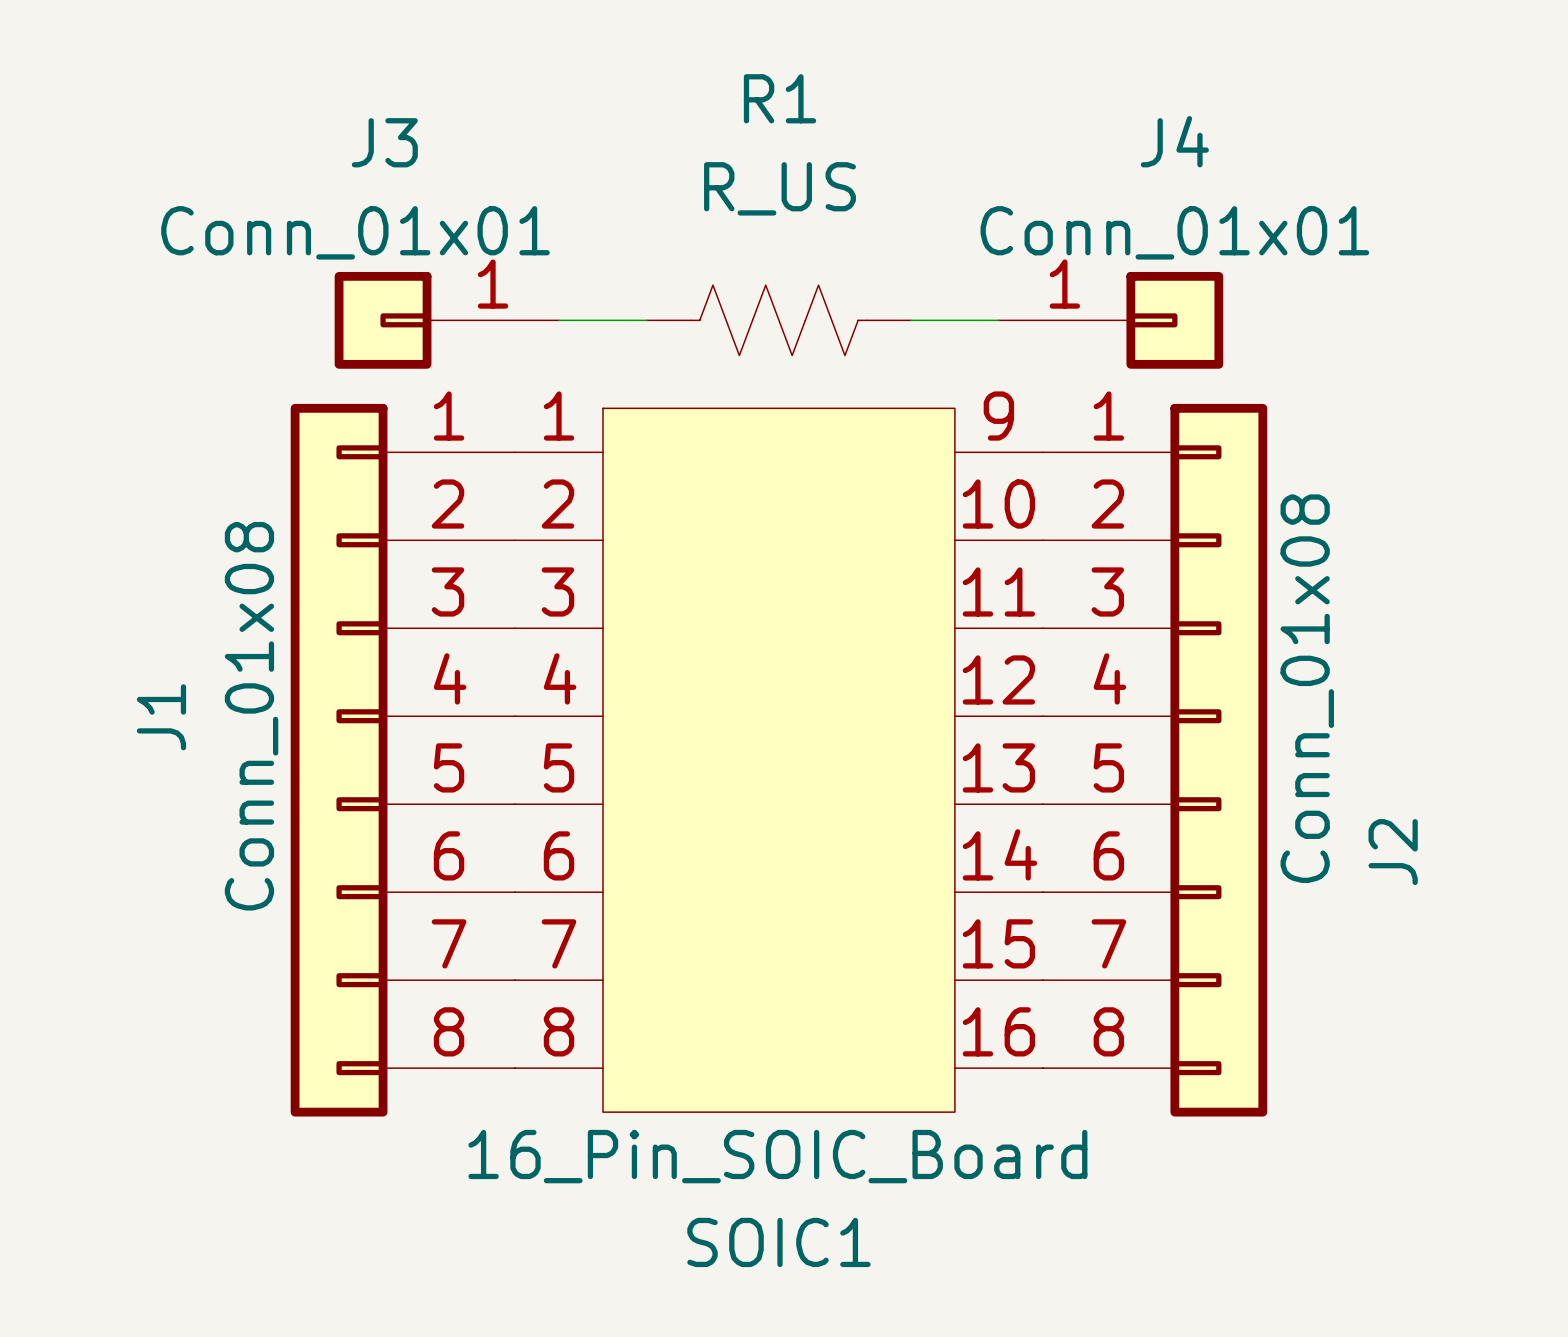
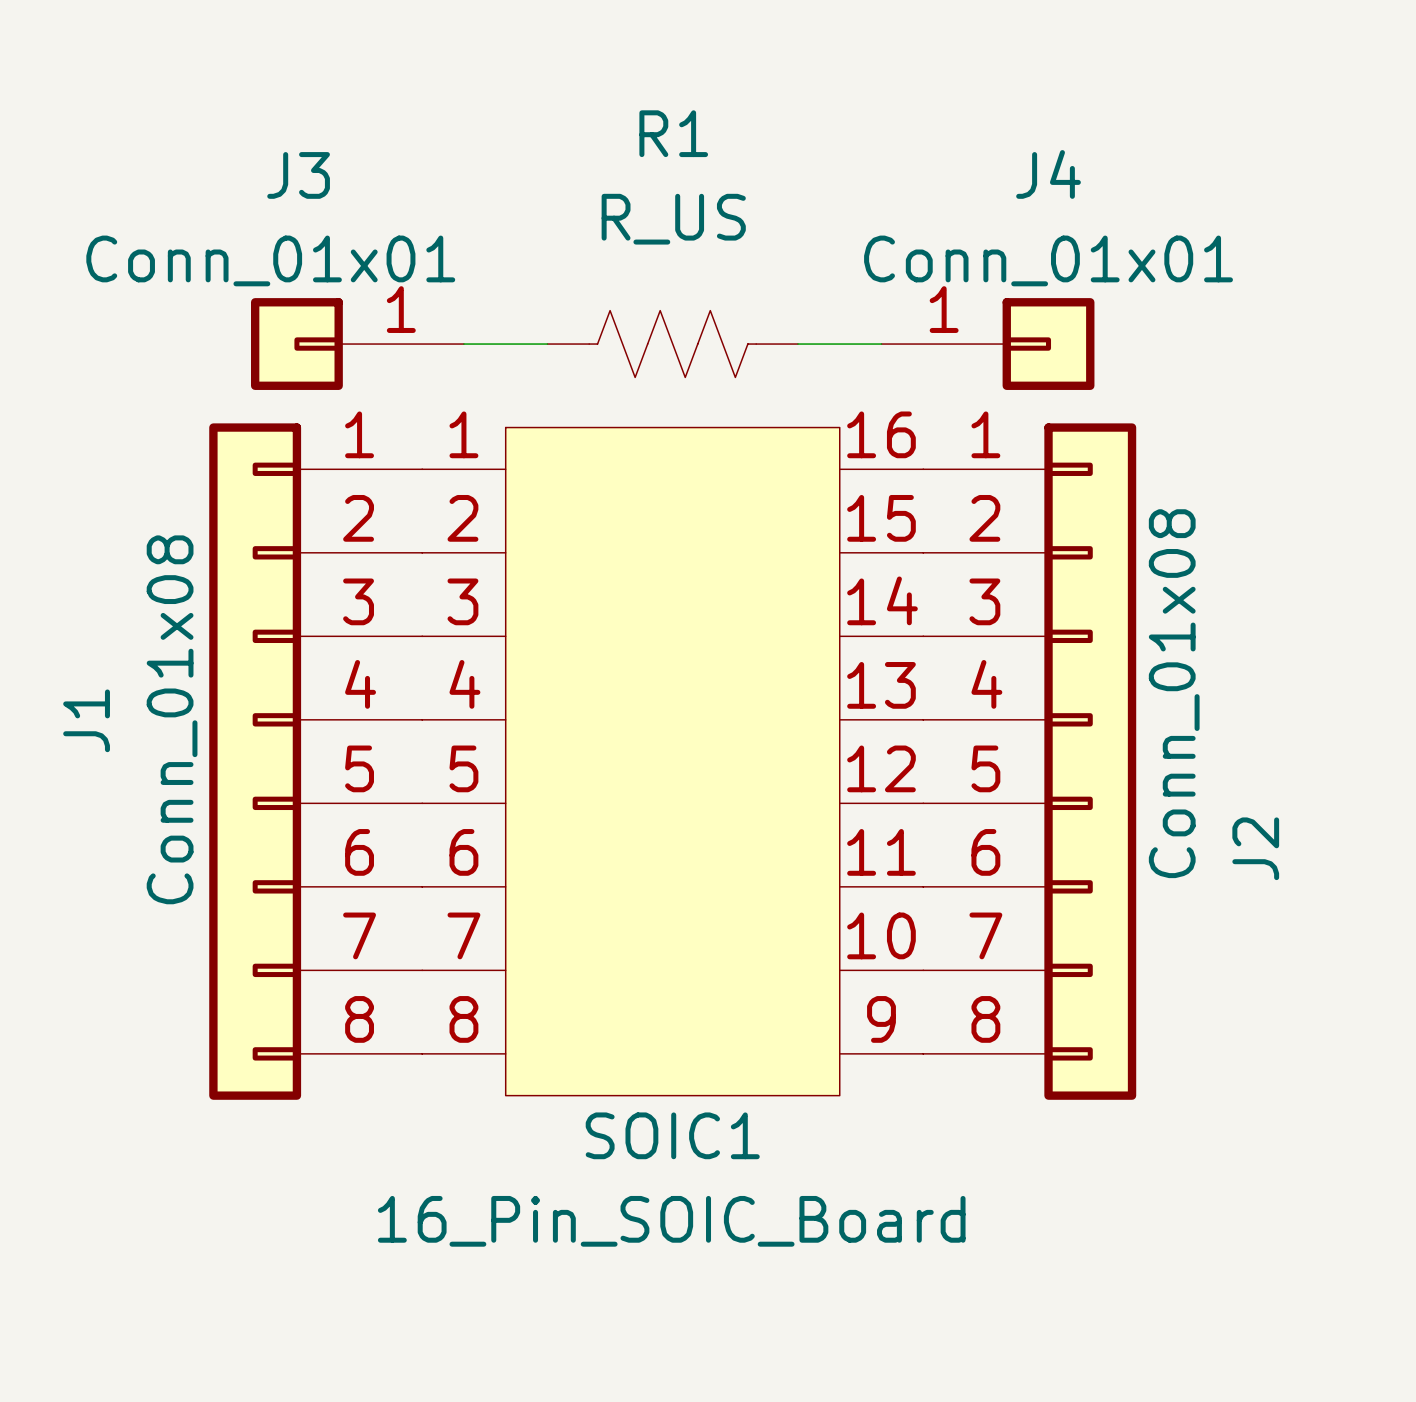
SOIC1 pin number: 9 (998, 416) -> 16 (881, 434)
SOIC1 pin number: 10 (998, 504) -> 15 (881, 518)
SOIC1 pin number: 11 (998, 591) -> 14 (882, 600)
SOIC1 pin number: 12 (998, 679) -> 13 (881, 685)
SOIC1 pin number: 13 (998, 767) -> 12 (881, 768)
SOIC1 pin number: 14 (999, 854) -> 11 (881, 852)
SOIC1 pin number: 15 (998, 943) -> 10 (881, 935)
SOIC1 pin number: 16 (998, 1031) -> 9 (881, 1019)
SOIC1 value position: 16_Pin_SOIC_Board (777, 1156) -> 16_Pin_SOIC_Board (671, 1221)
SOIC1 name position: SOIC1 (778, 1242) -> SOIC1 (672, 1135)

